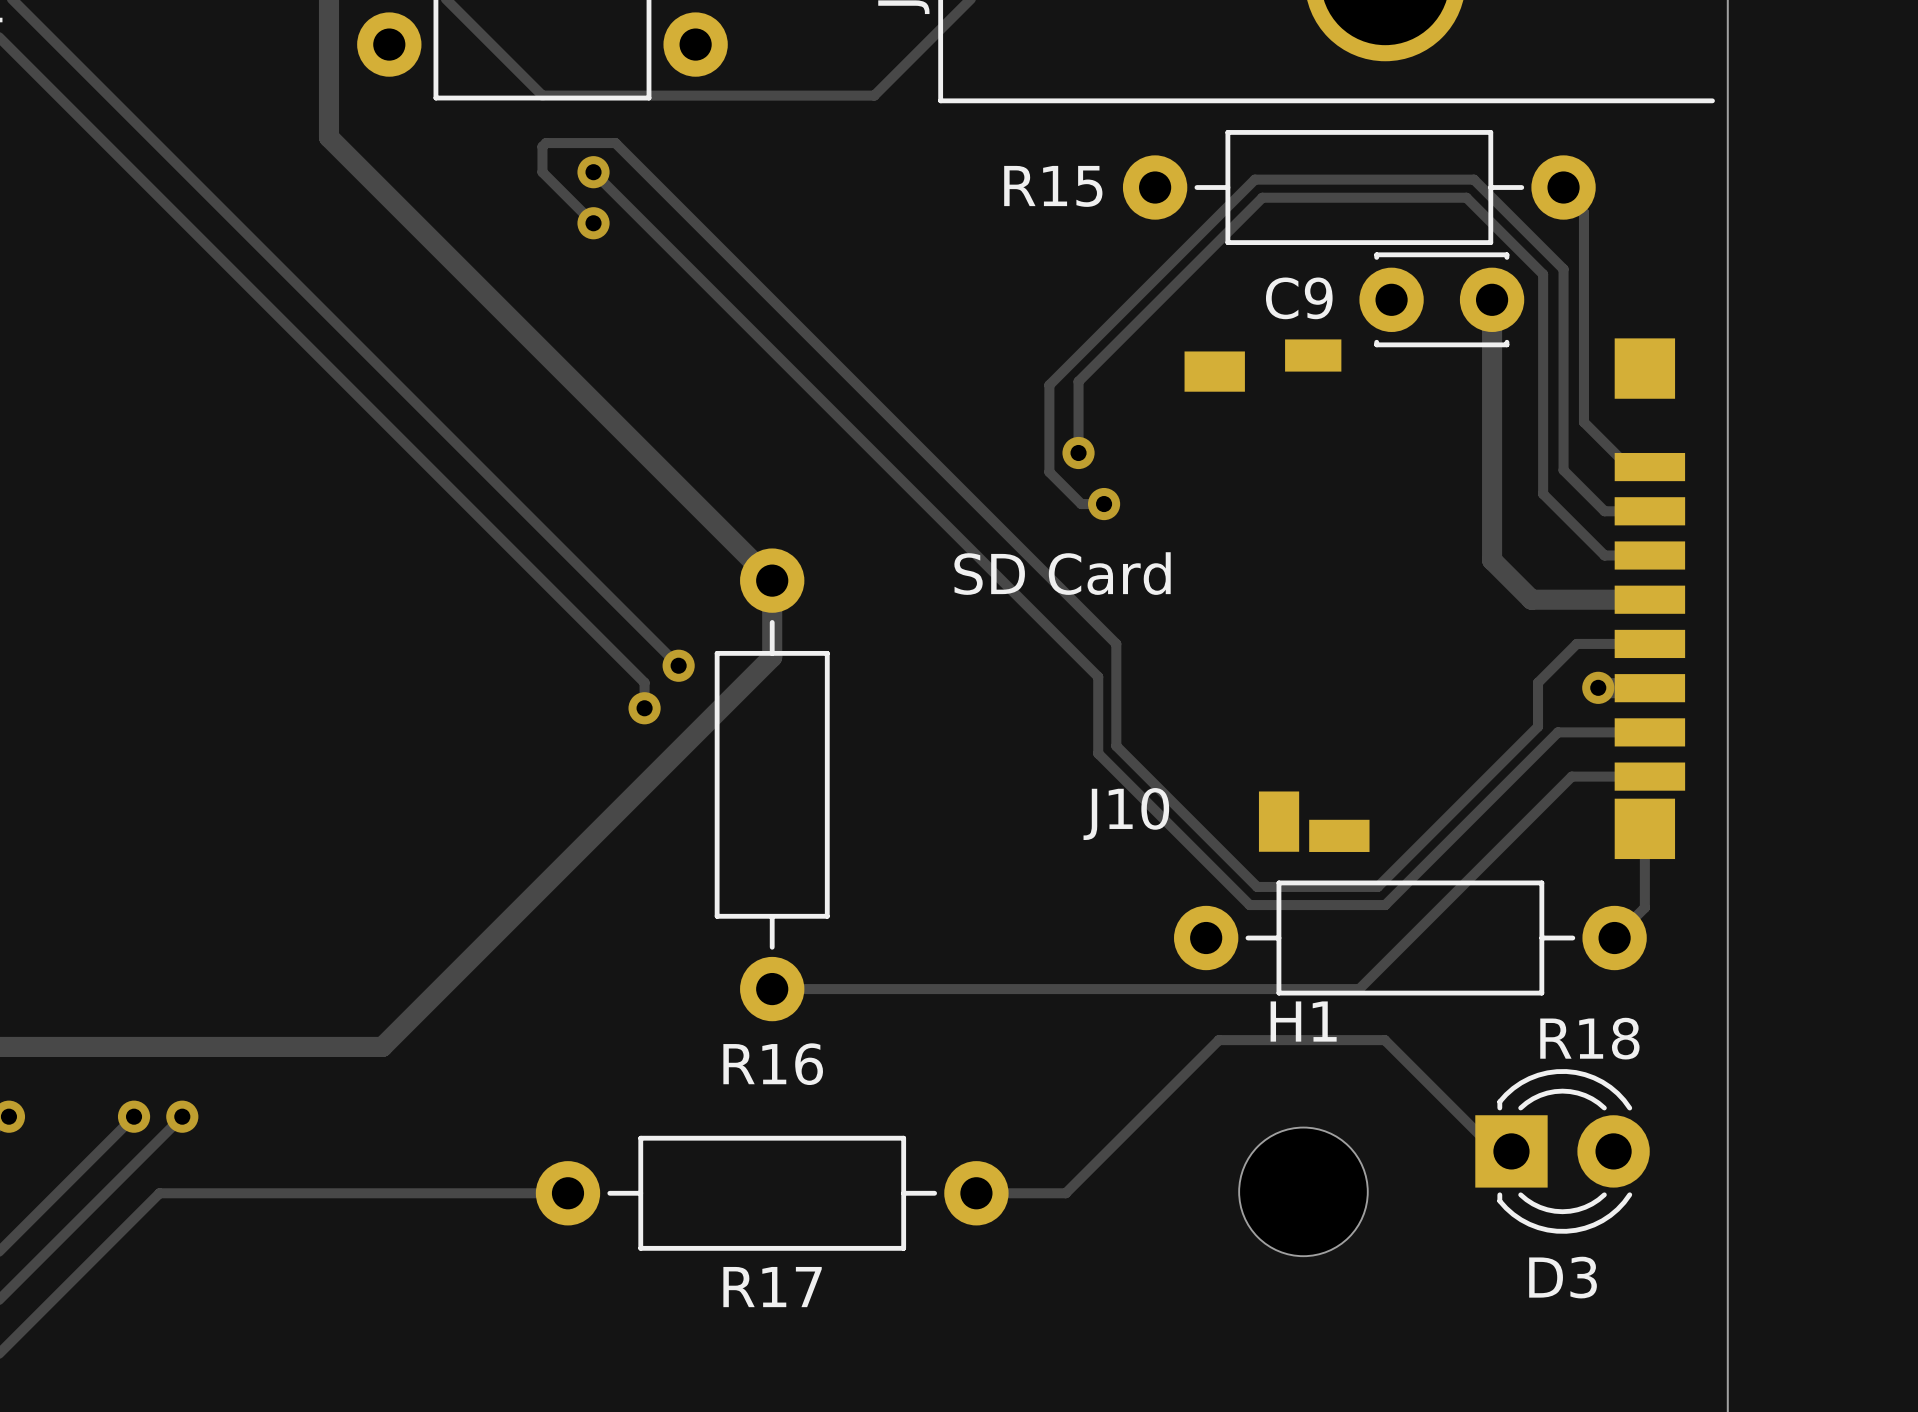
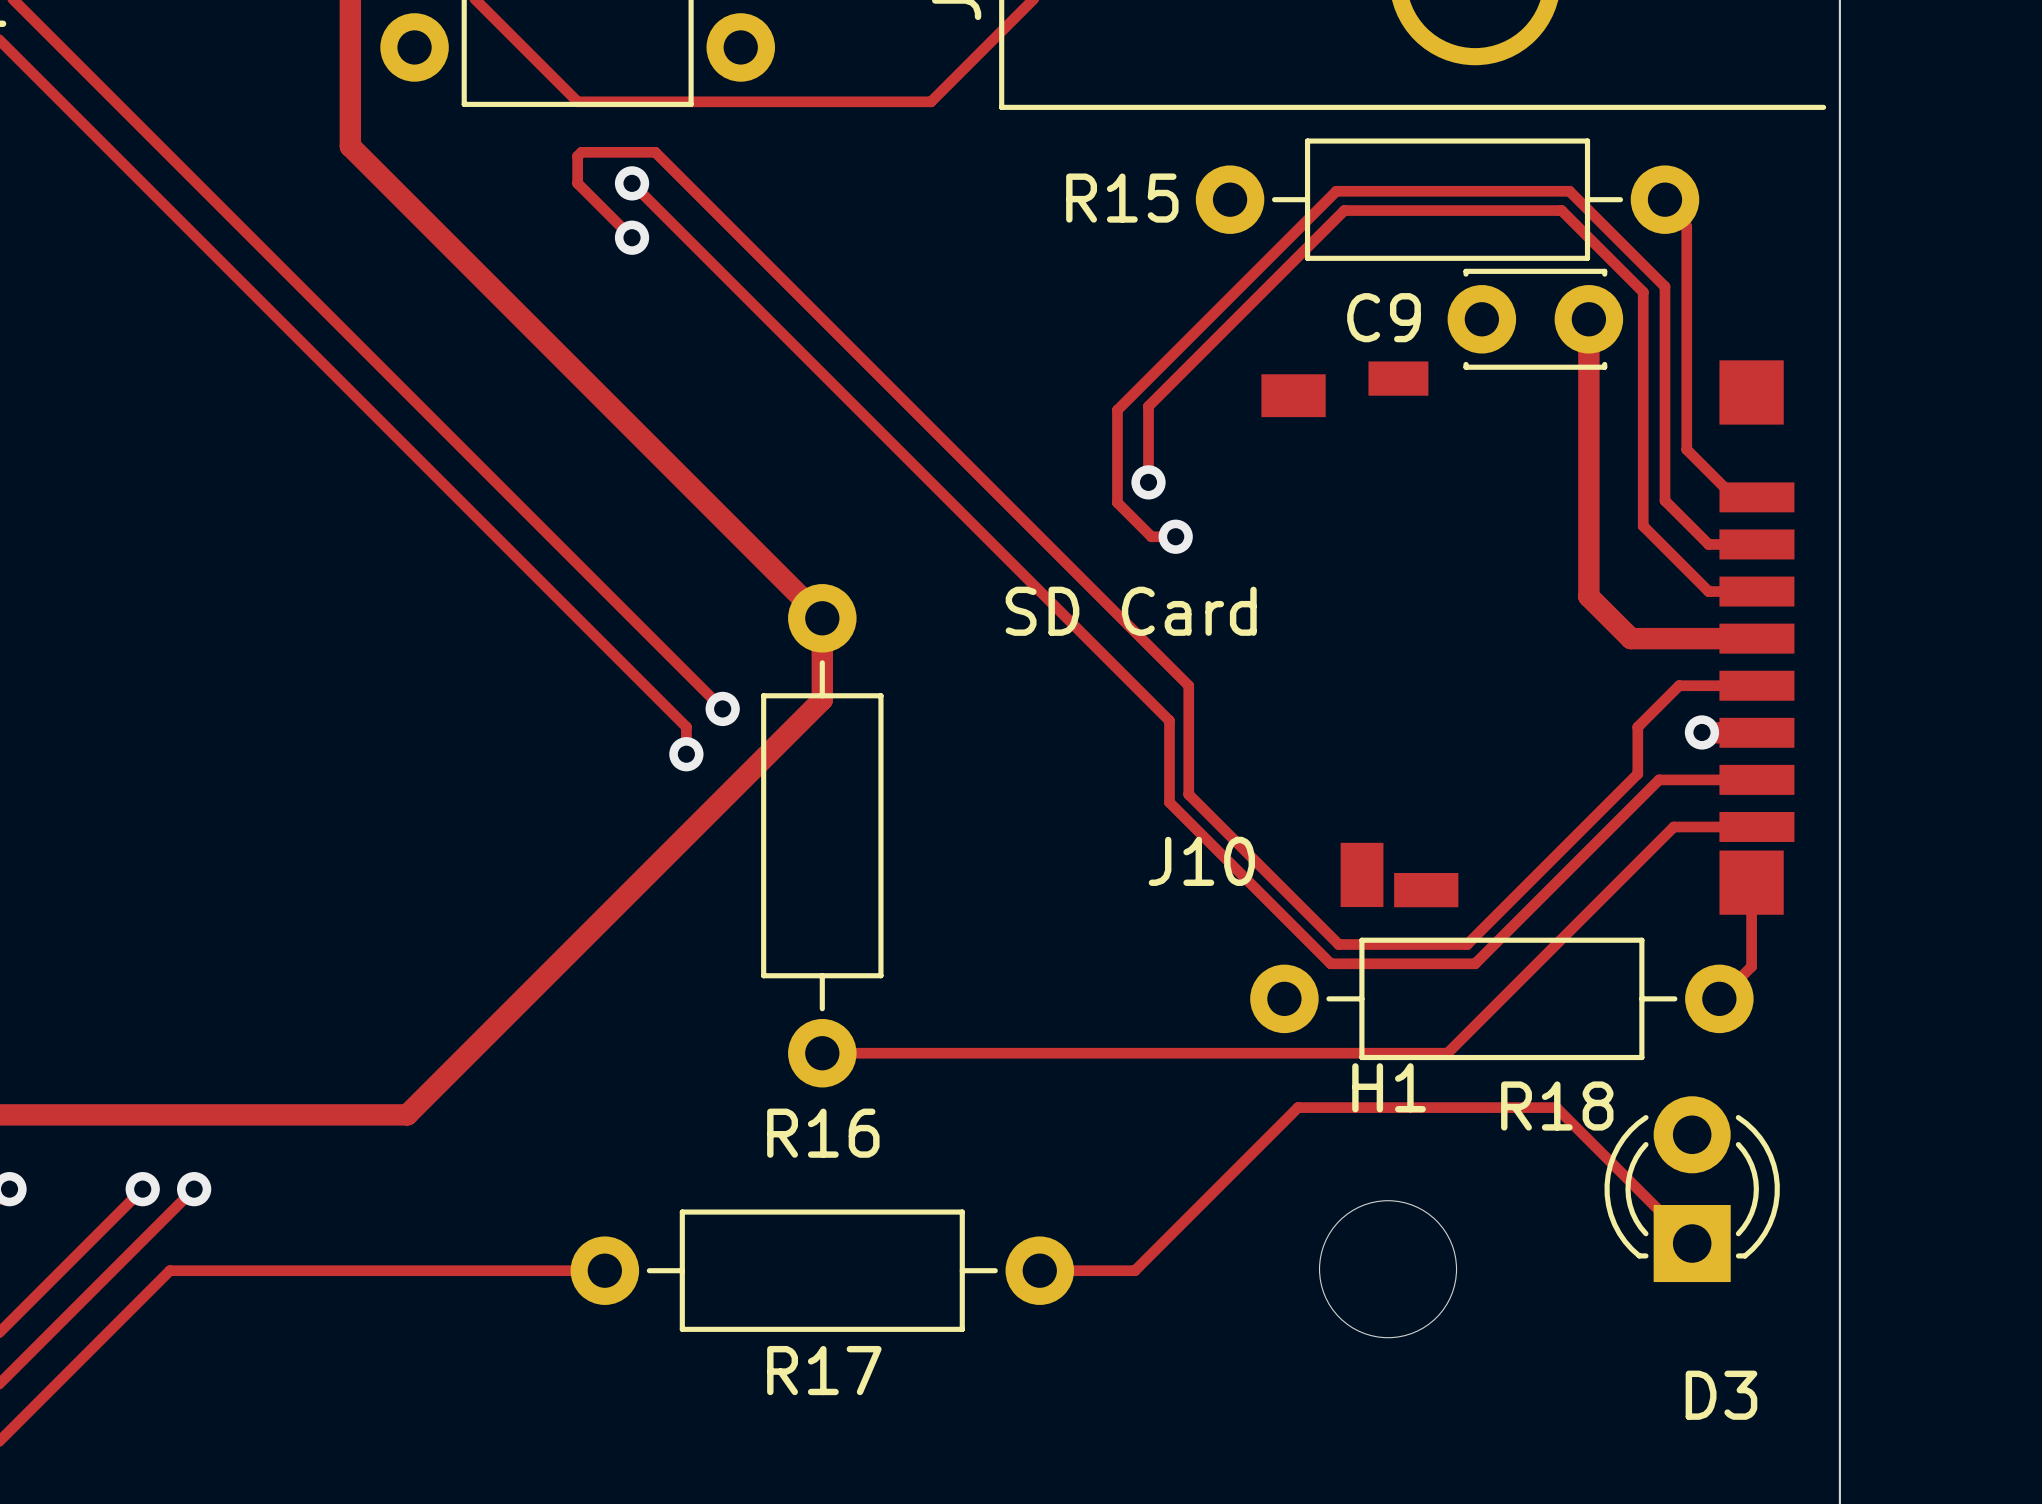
R18 name position: R18 (1589, 1038) -> R18 (1557, 1106)
track: (1384, 1040) (1496, 1151) -> (1474, 1107) (1556, 1107) (1664, 1216)
D3 rotation: 0° (1562, 1151) -> 90° counterclockwise (1692, 1189)

